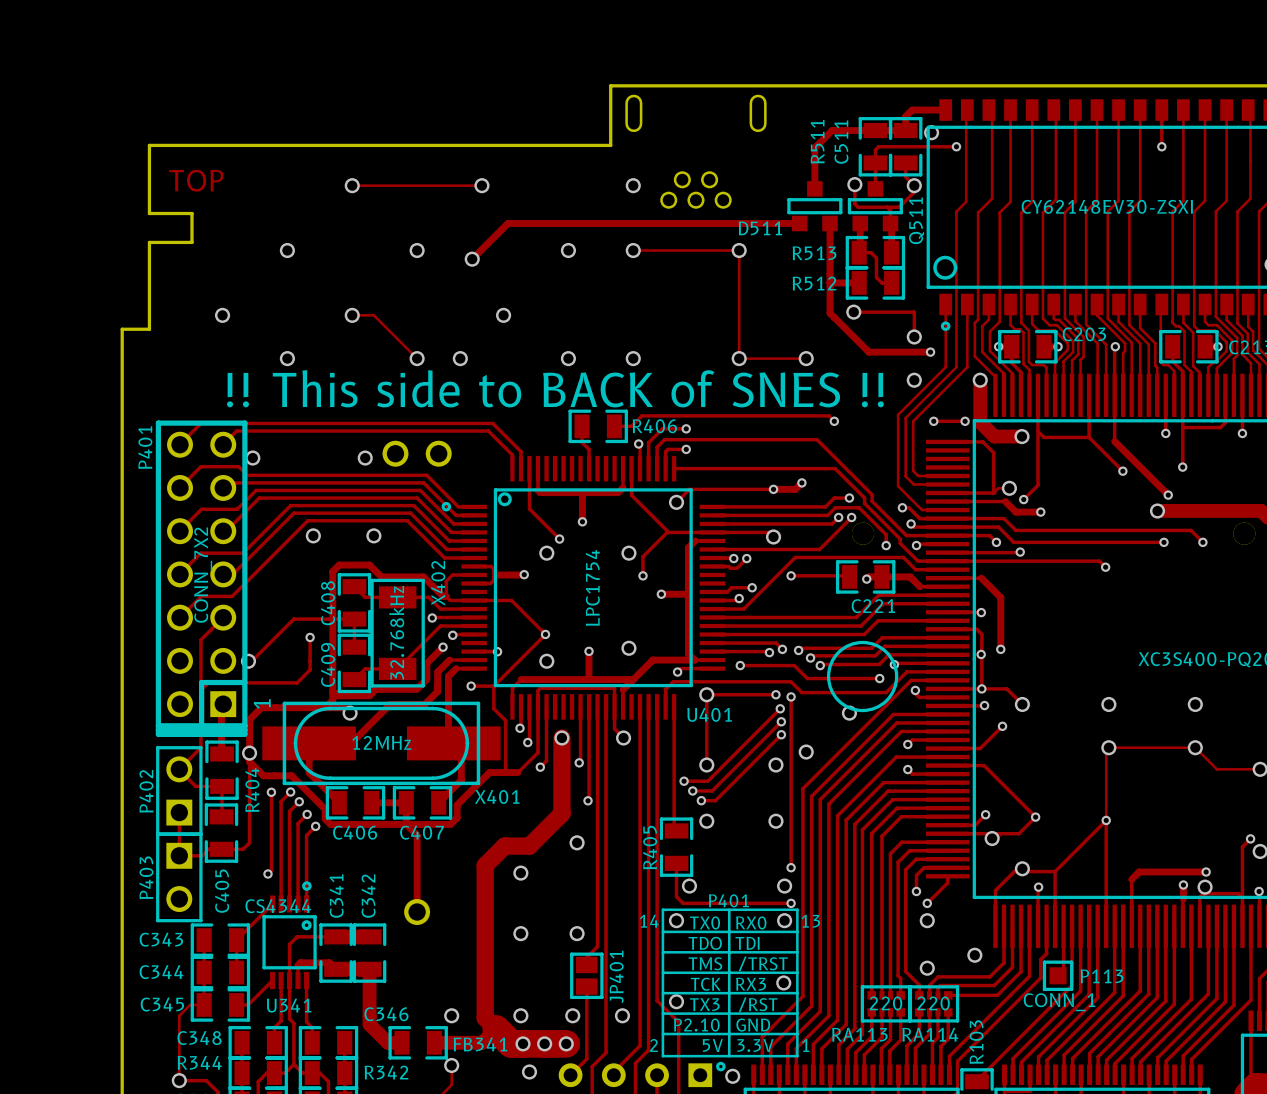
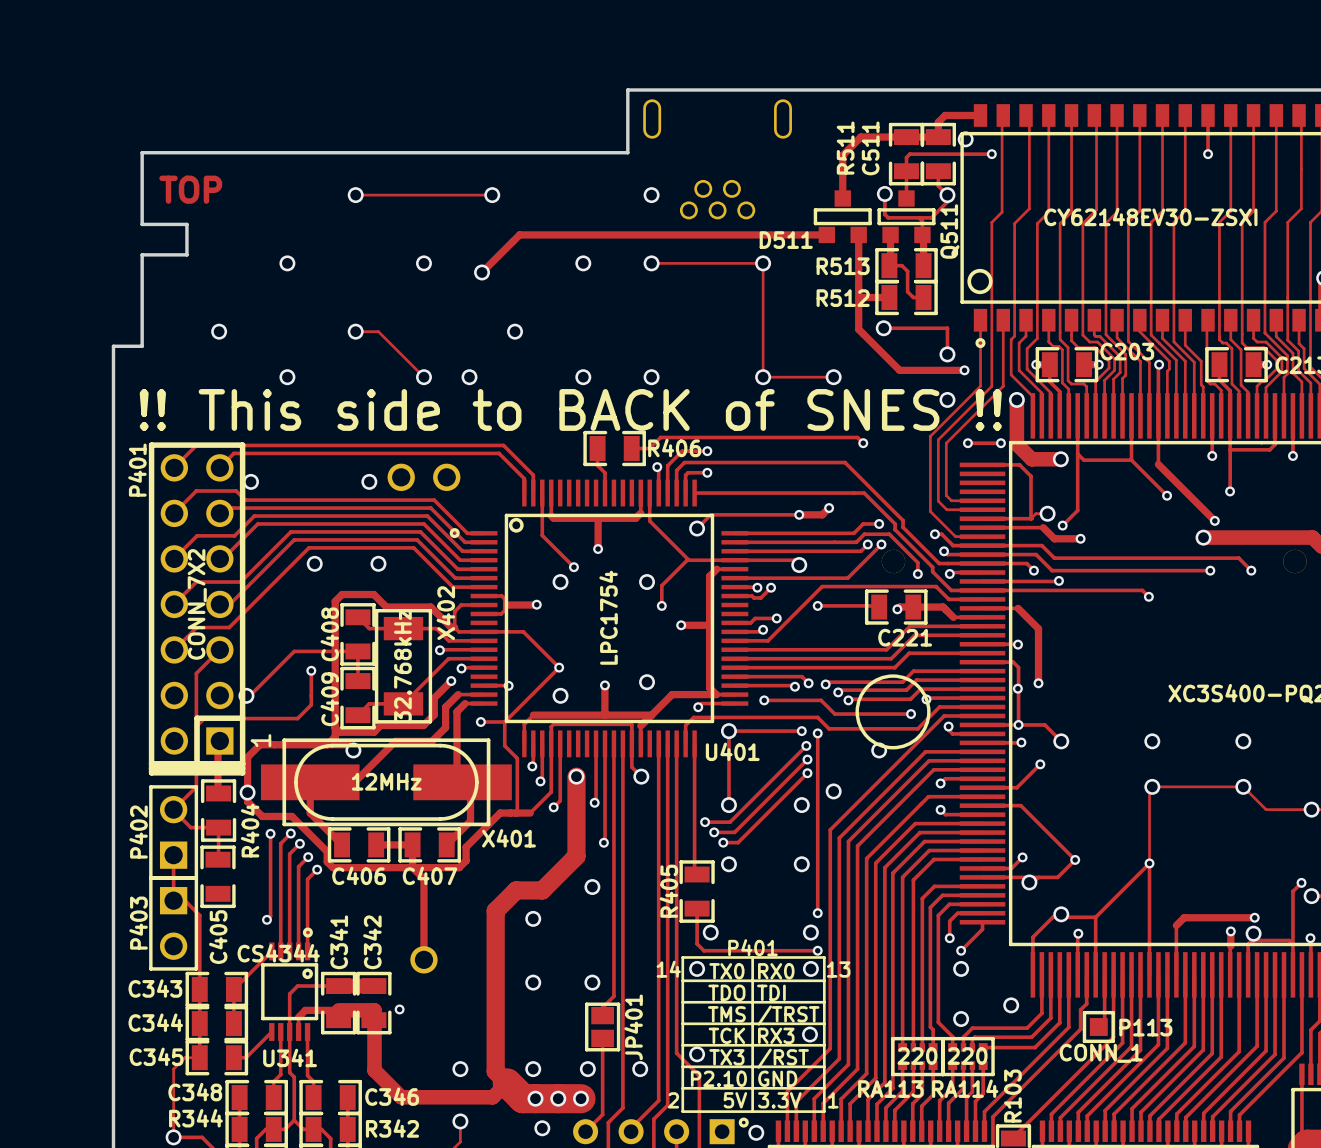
track: (249, 753) (249, 842) (243, 849) (208, 849) (202, 855) (190, 855) -> (199, 989) (199, 915) (184, 900)
via: none -> (399, 1009)
track: (298, 966) (300, 962) (329, 962) (336, 969) (369, 969) (369, 1024) (387, 1042) (401, 1042) -> (298, 1017) (305, 1010) (374, 1010) (374, 1070) (401, 1097) (492, 1097)
C346 name position: C346 (386, 1014) -> C346 (392, 1096)
FB341: (418, 1042) -> none

